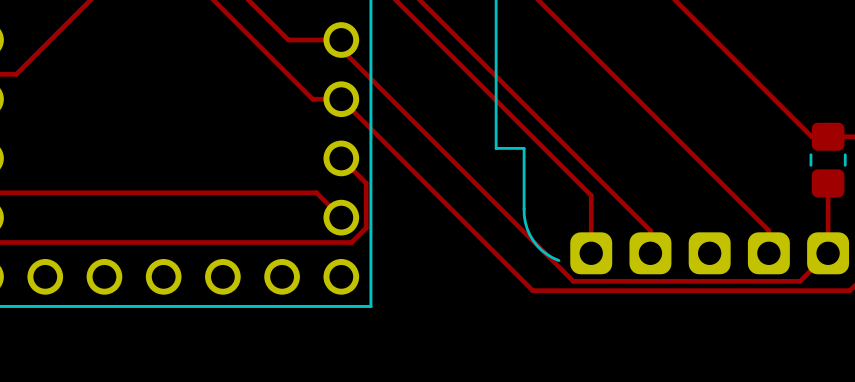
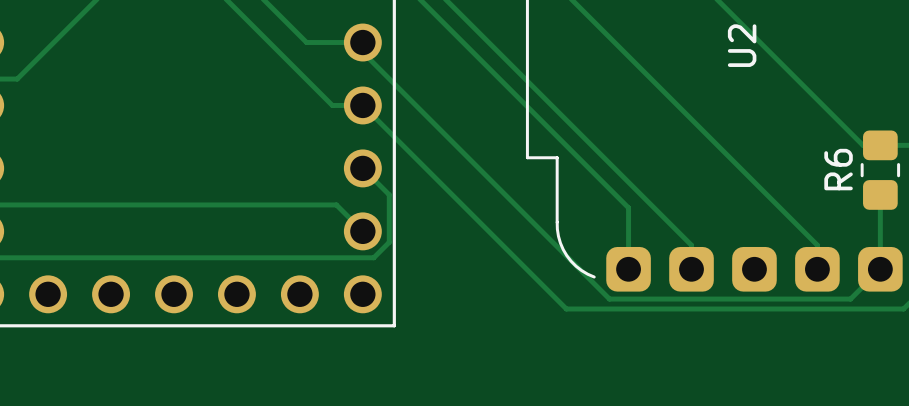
U2 name: none -> U2 (742, 45)
R6 name: none -> R6 (838, 169)

